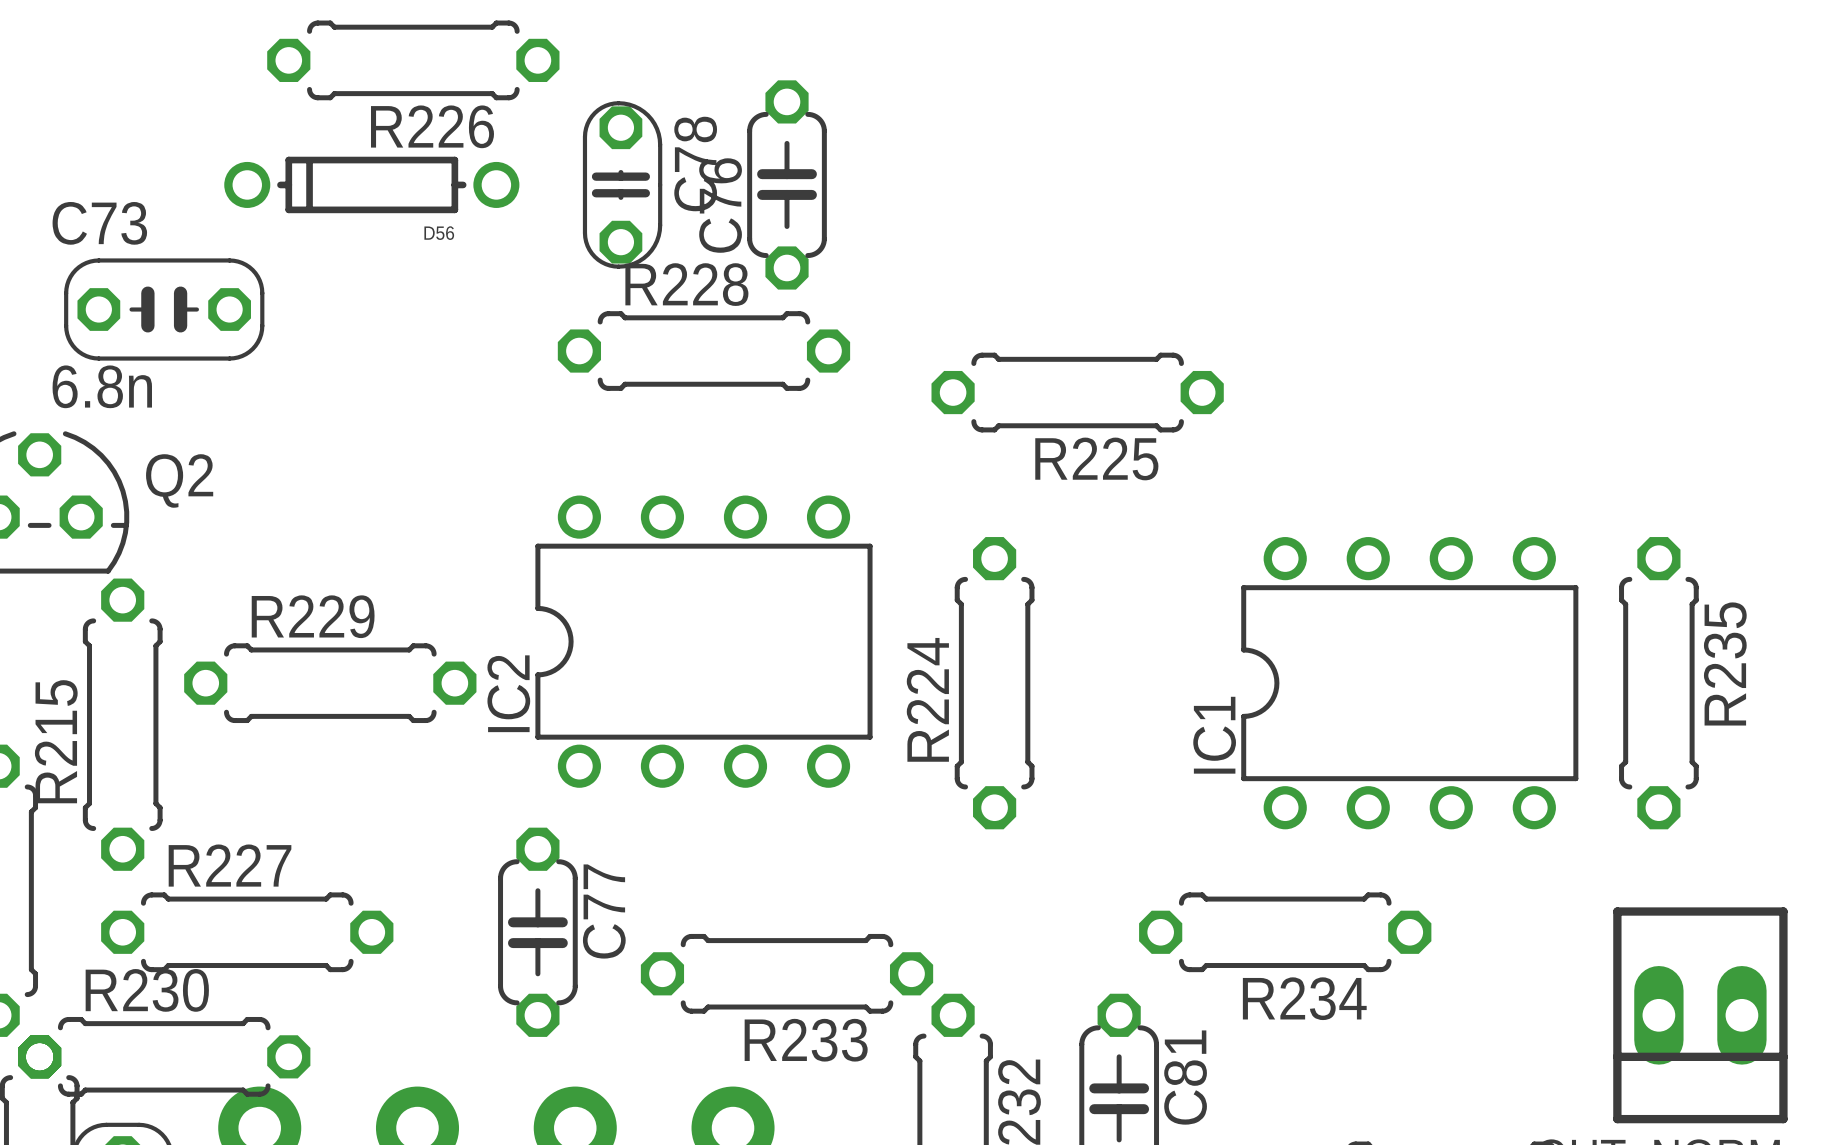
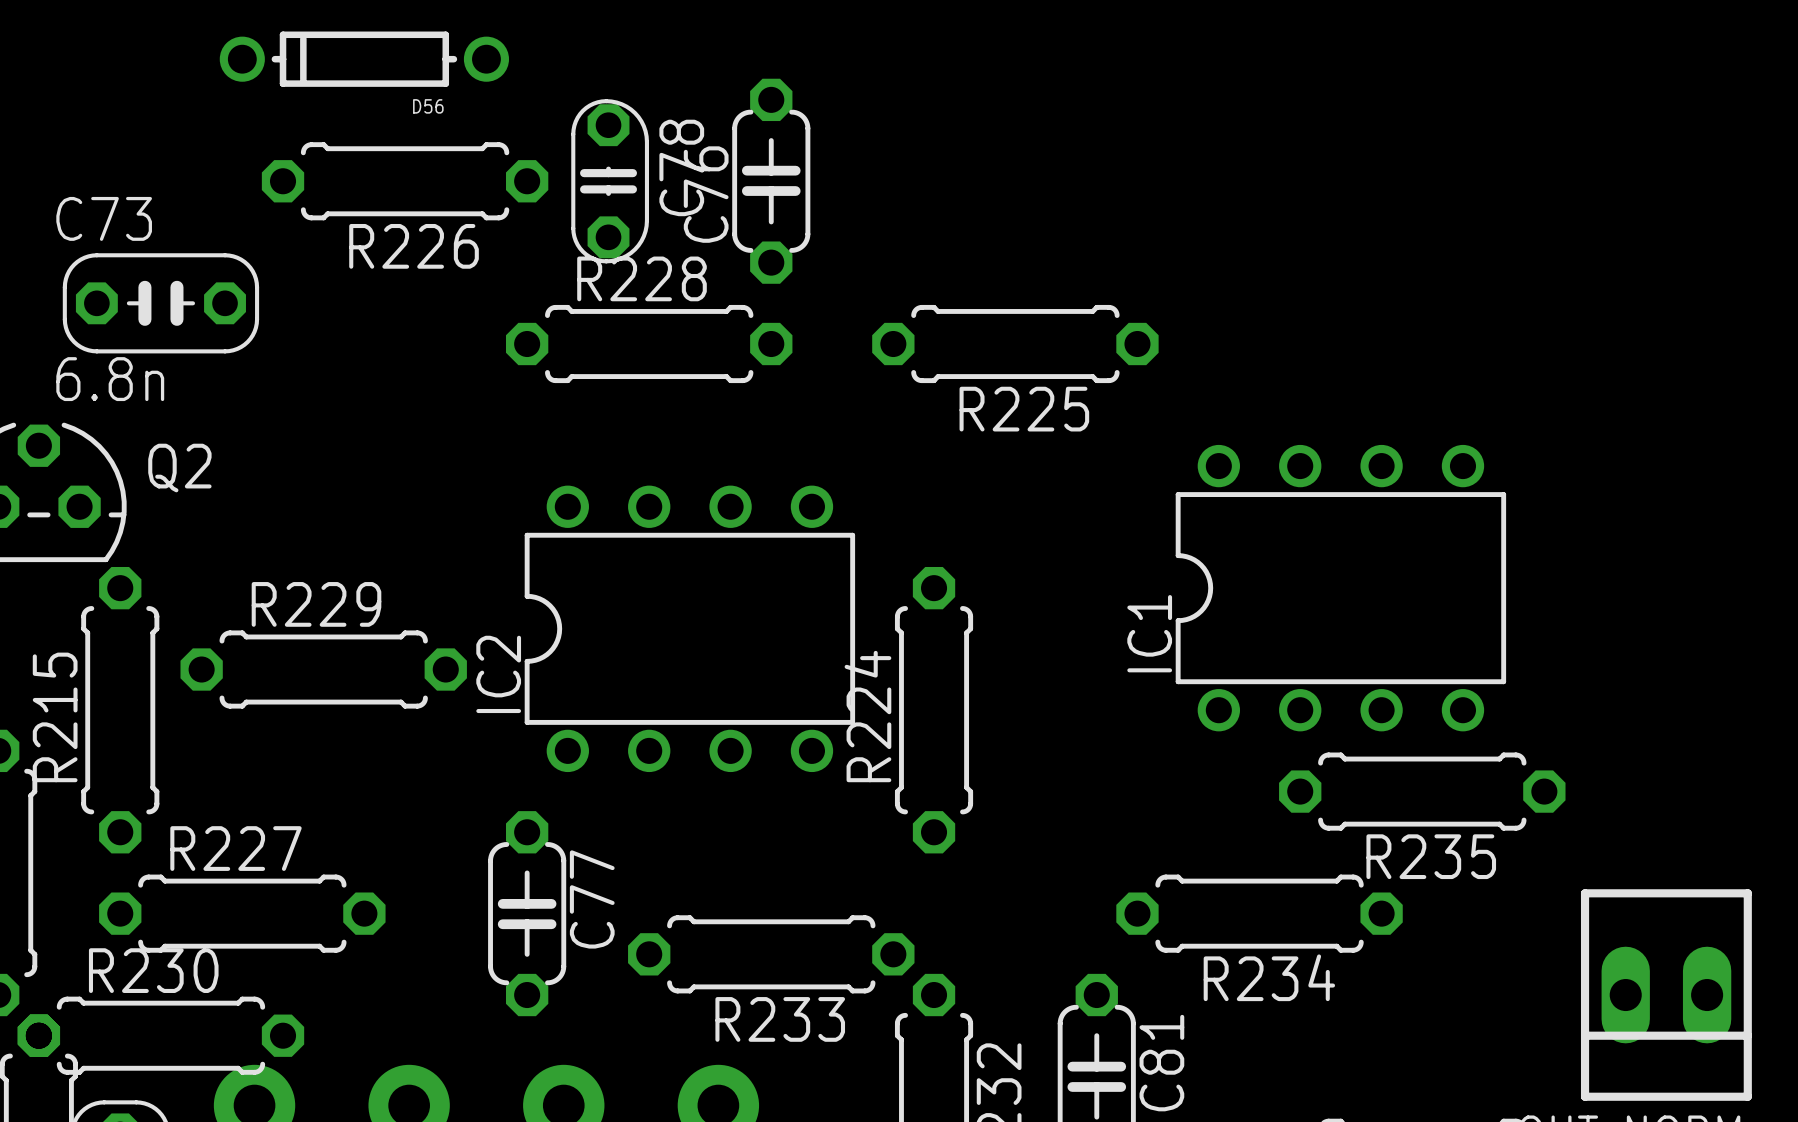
R226 position: (413, 60) -> (405, 181)
D56 position: (371, 184) -> (364, 59)
R228 position: (703, 351) -> (649, 344)
R225 position: (1077, 392) -> (1015, 344)
R224 position: (994, 683) -> (934, 710)
IC1 position: (1409, 683) -> (1340, 588)
R235 rotation: 0° (1658, 683) -> 90° clockwise (1422, 791)
R235 position: (1658, 683) -> (1422, 791)

